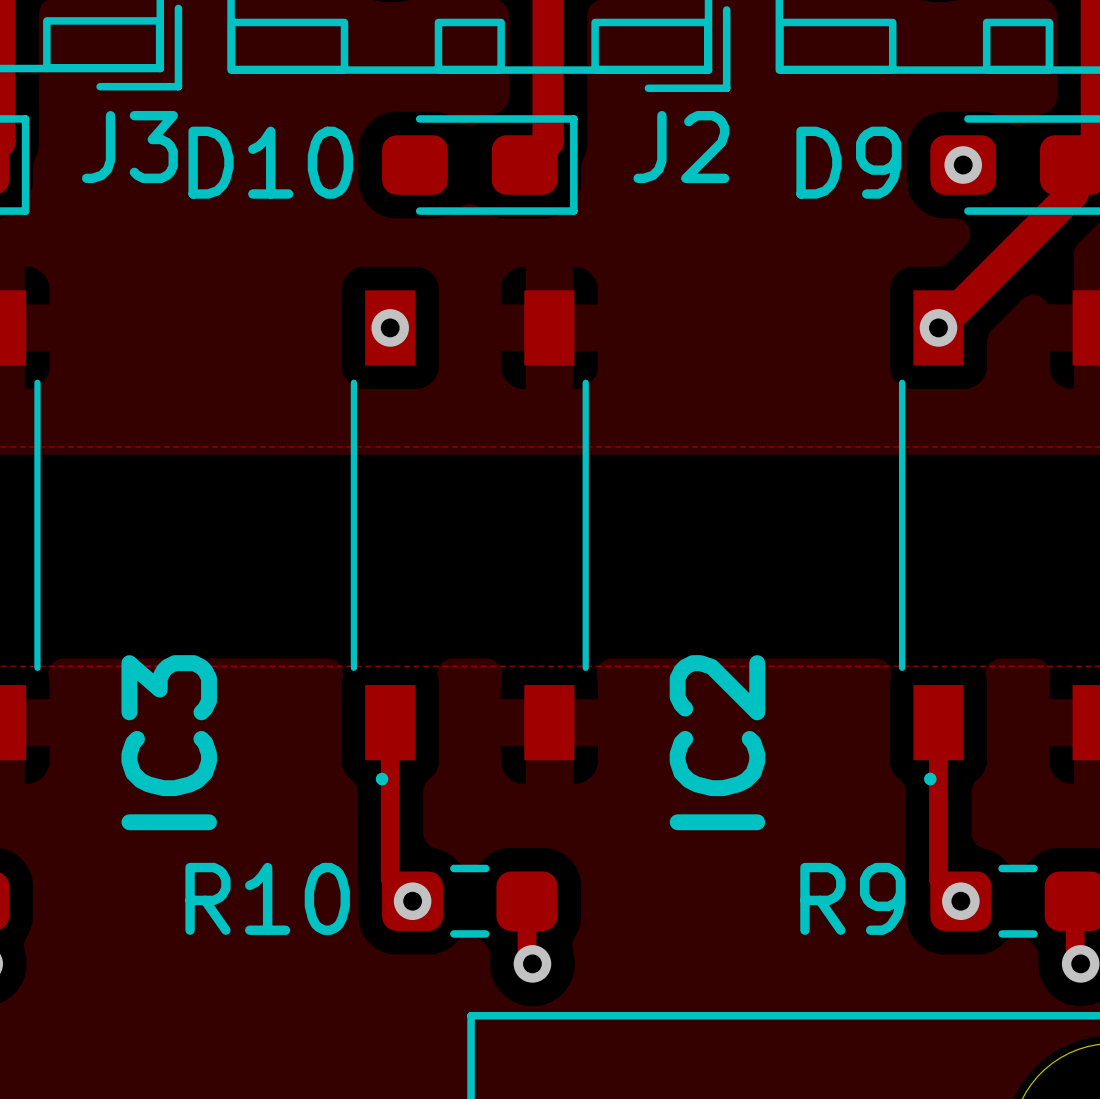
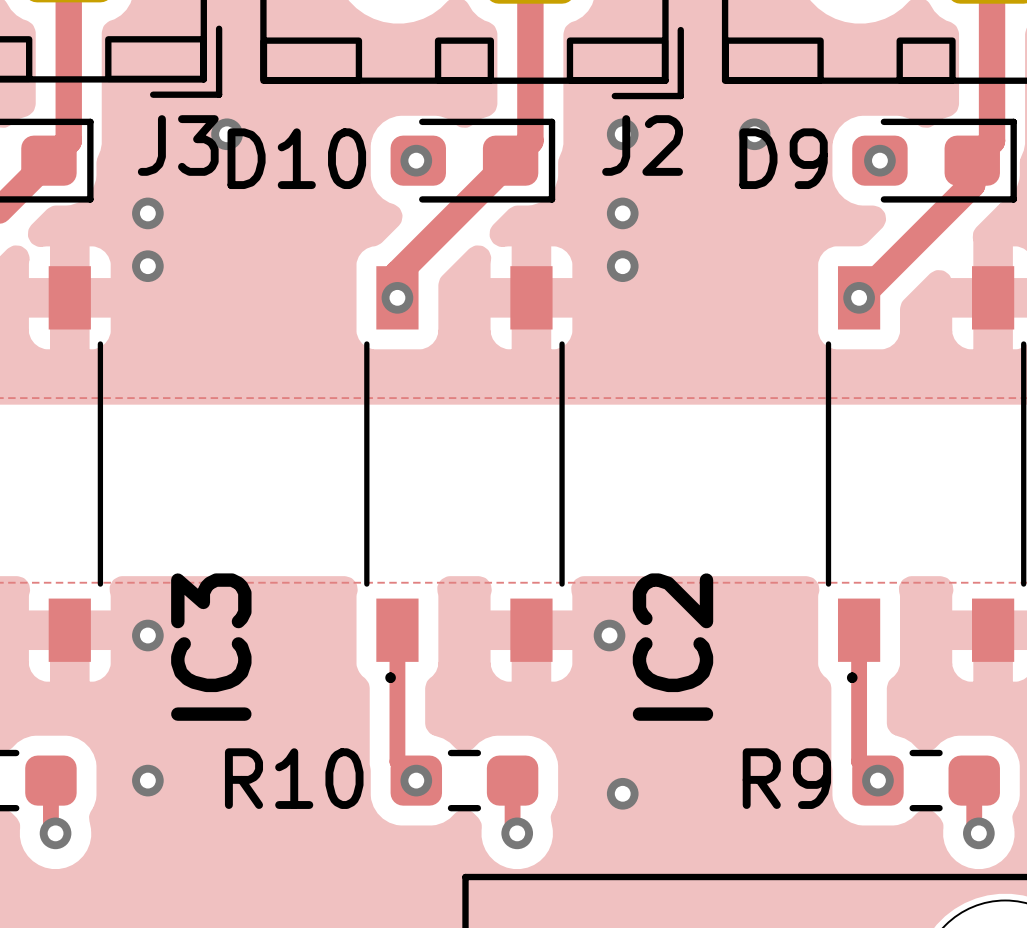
via: none -> (227, 134)
via: none -> (622, 134)
via: none -> (754, 134)
via: none -> (416, 160)
track: none -> (510, 160) (397, 273) (397, 297)
via: none -> (147, 213)
via: none -> (622, 213)
via: none -> (147, 266)
via: none -> (622, 266)
via: none -> (147, 635)
via: none -> (609, 635)
via: none -> (147, 780)
via: none -> (622, 793)

